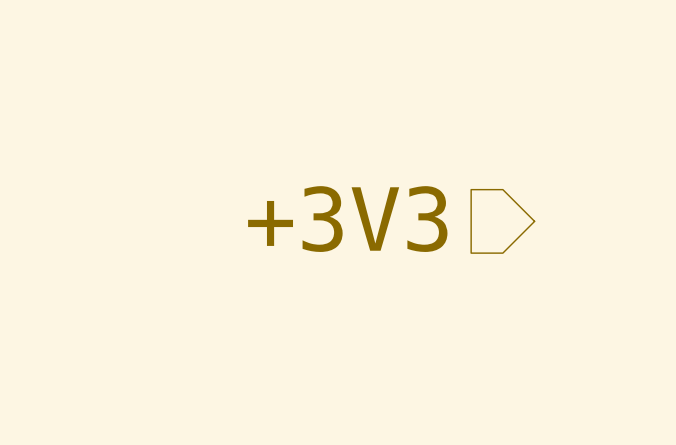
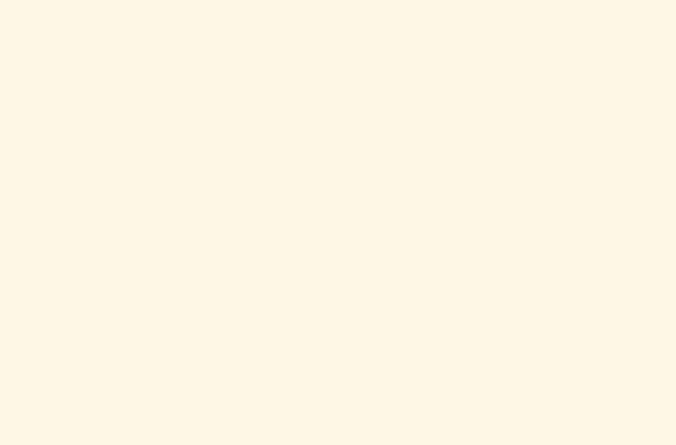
hierarchical label: +3V3 (347, 219) -> none

